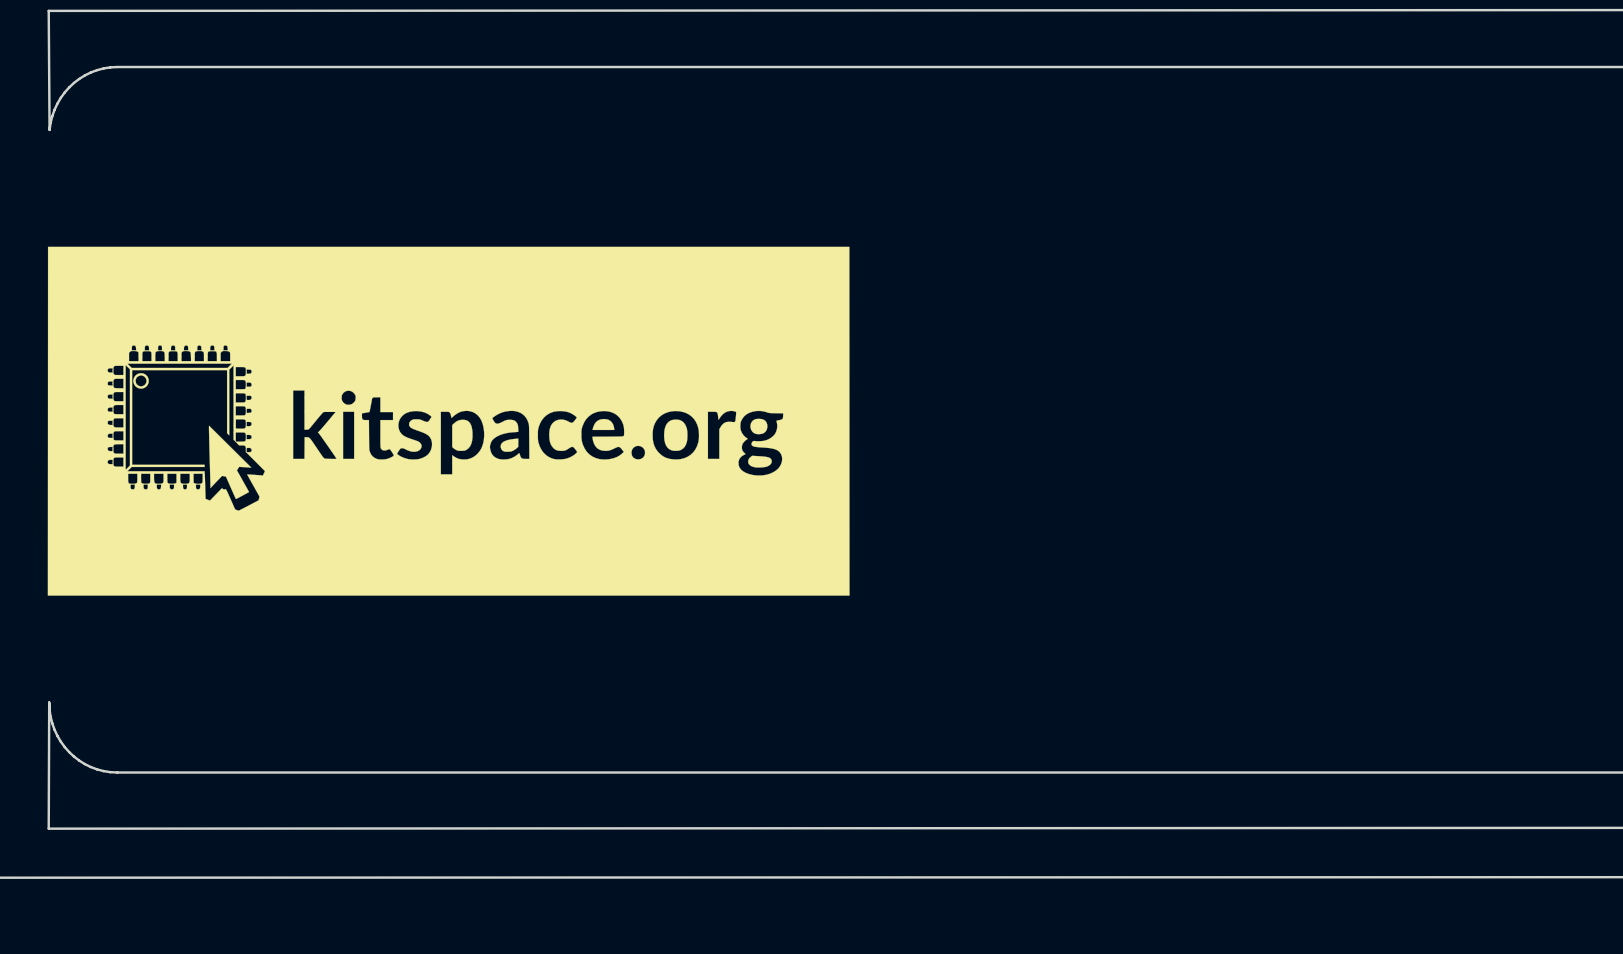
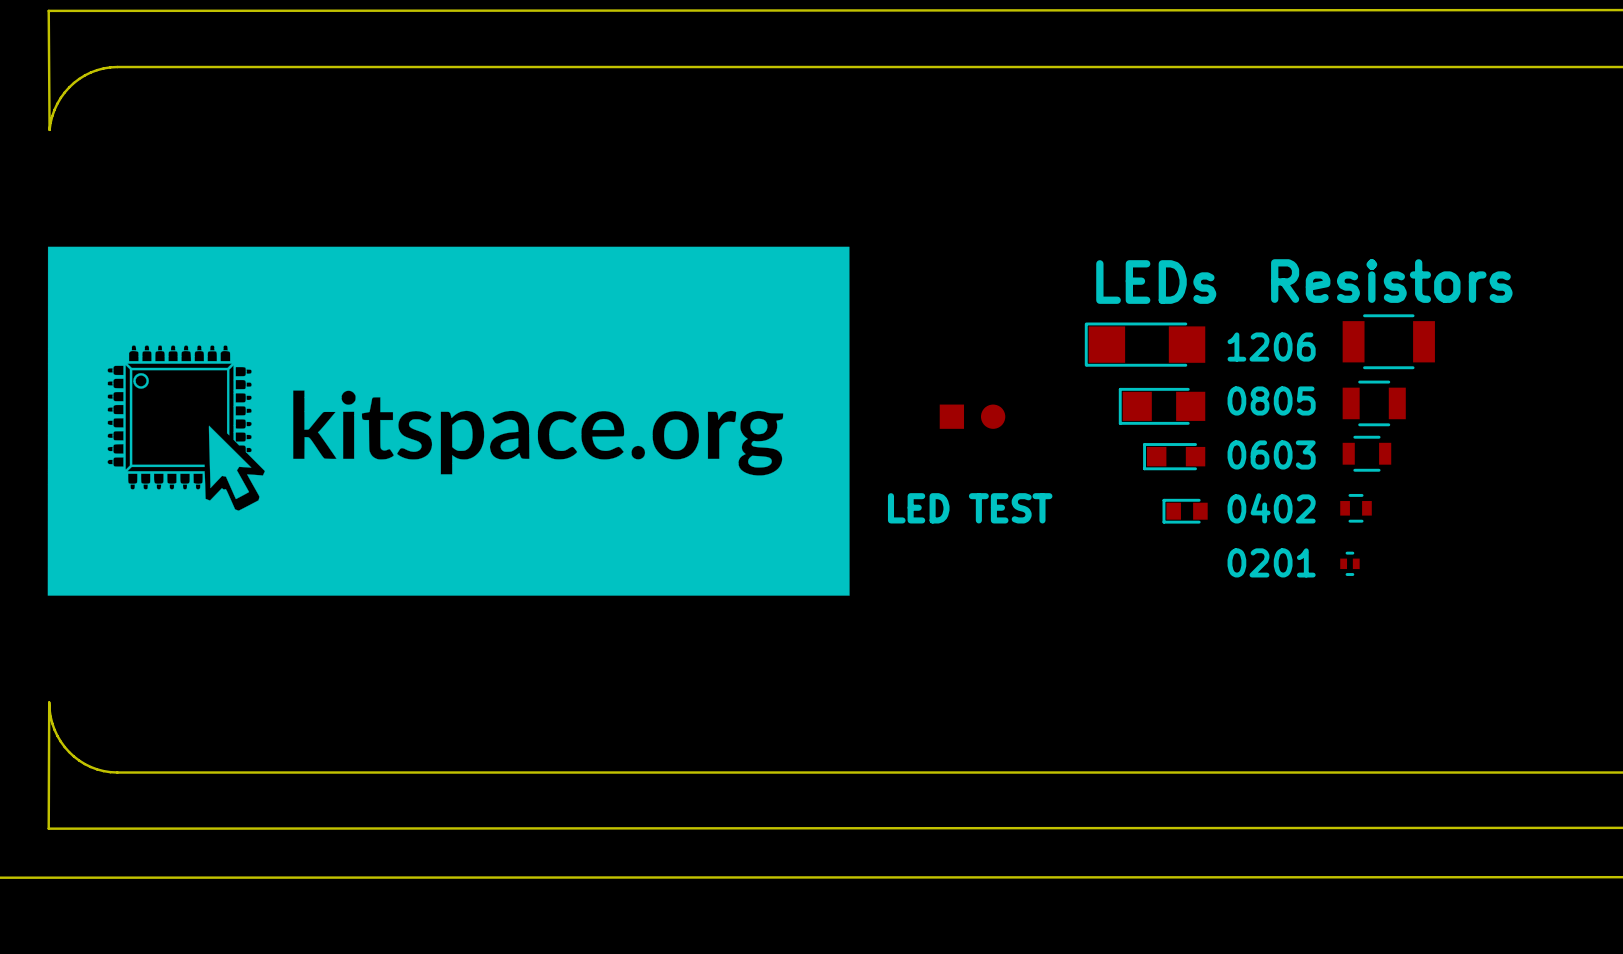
text: none -> Resistors (1391, 281)
text: none -> LEDs (1156, 282)
part: none -> (1388, 341)
part: none -> (1145, 344)
text: none -> 1206 (1271, 347)
text: none -> 0805 (1271, 400)
part: none -> (1374, 403)
part: none -> (1162, 406)
part: none -> (972, 416)
part: none -> (1366, 453)
text: none -> 0603 (1271, 454)
part: none -> (1174, 456)
text: none -> 0402 (1271, 508)
part: none -> (1356, 508)
part: none -> (1185, 511)
text: none -> 0201 (1271, 562)
part: none -> (1349, 563)

